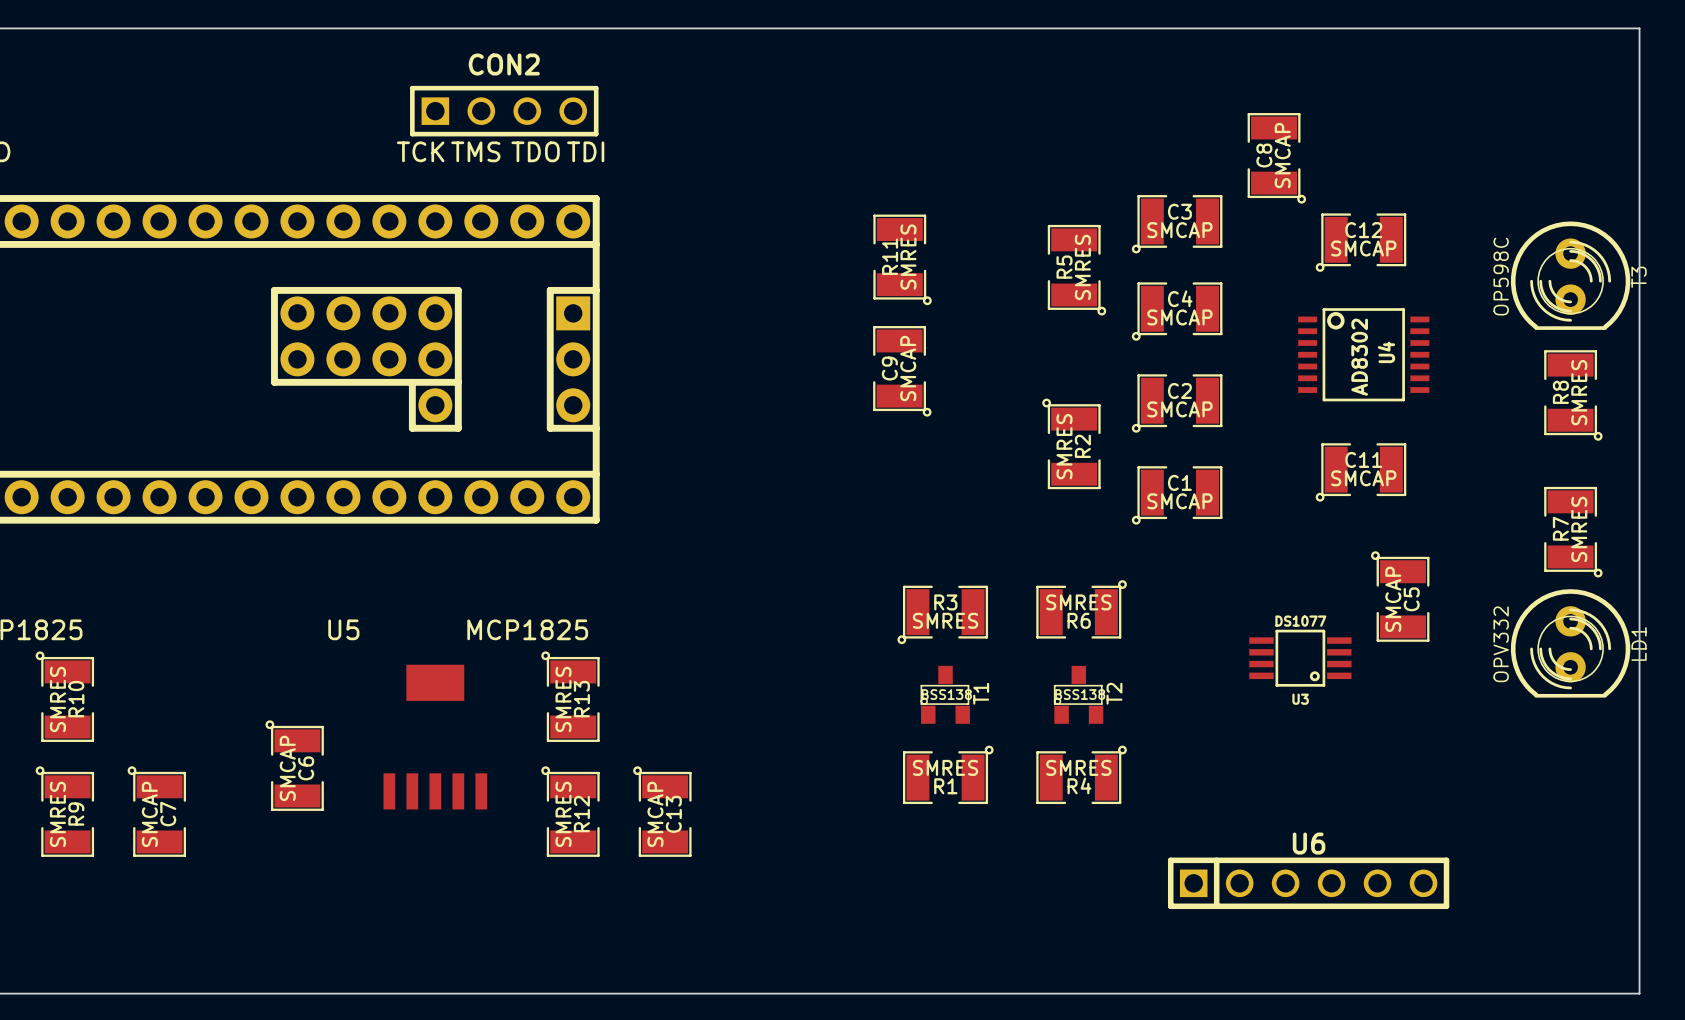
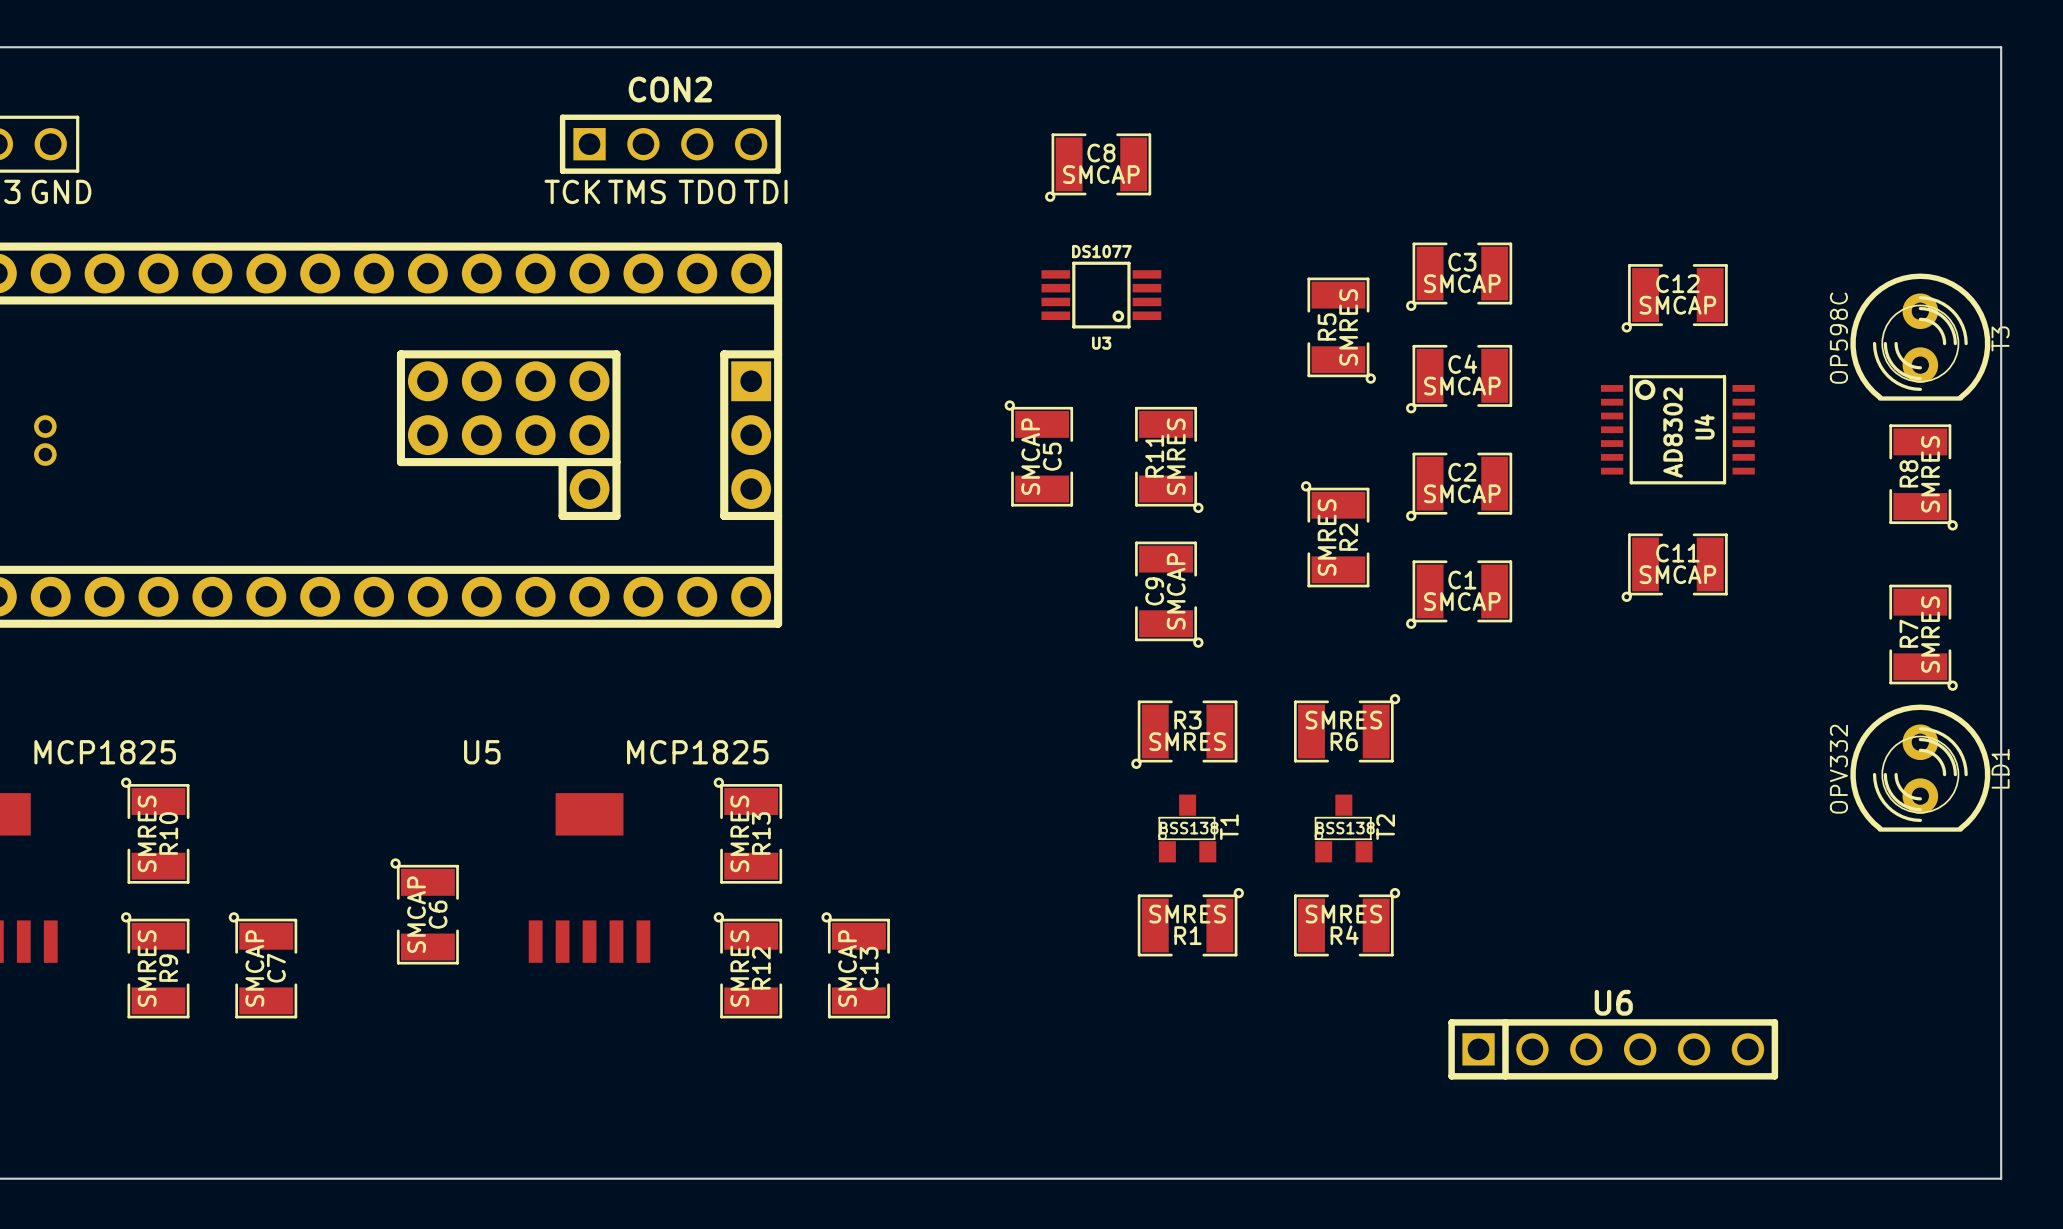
C8 rotation: 0° (1276, 158) -> 90° clockwise (1098, 167)
C8 position: (1276, 158) -> (1098, 167)
R11 position: (902, 259) -> (1169, 459)
C9 position: (902, 371) -> (1169, 594)
C5 position: (1400, 596) -> (1038, 453)
U3 footprint: [1249, 629, 1352, 687] -> [1041, 261, 1162, 329]

